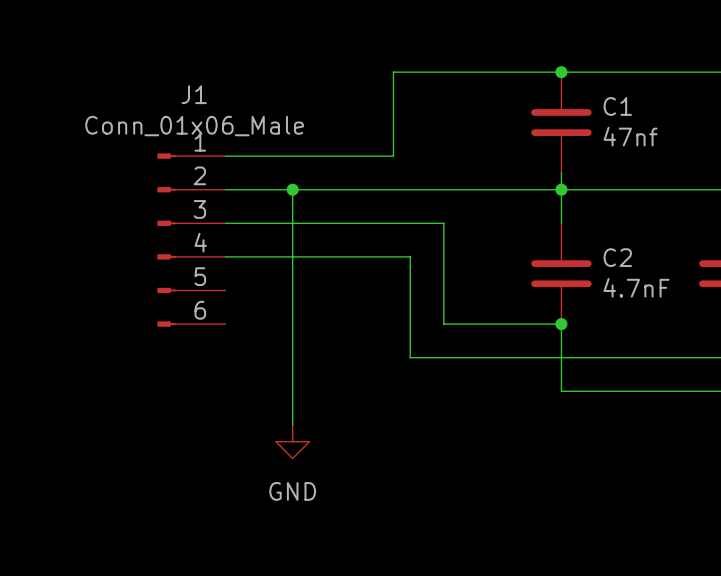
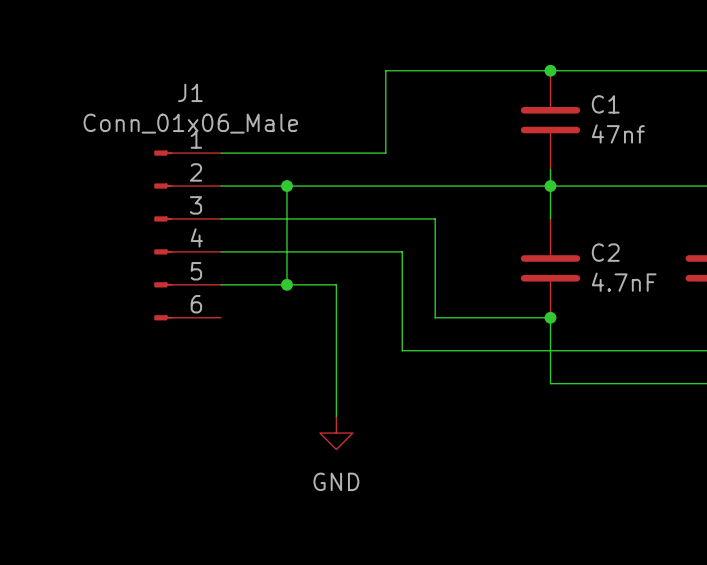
wire: none -> (221, 284) (336, 284) (336, 416)
wire: (292, 290) (292, 424) -> none
junction: none -> (286, 284)
power symbol position: GND (292, 441) -> GND (336, 433)

